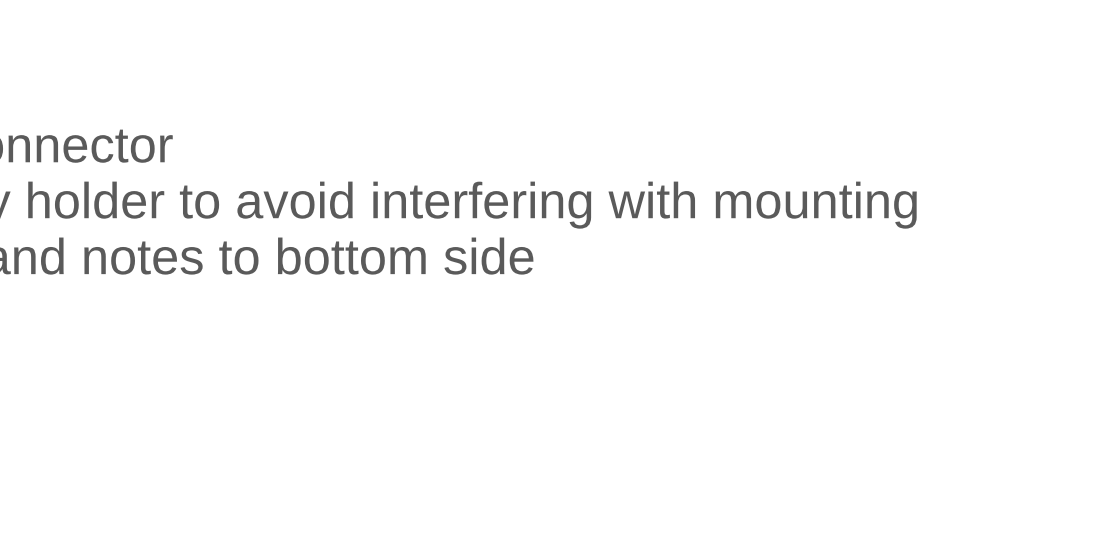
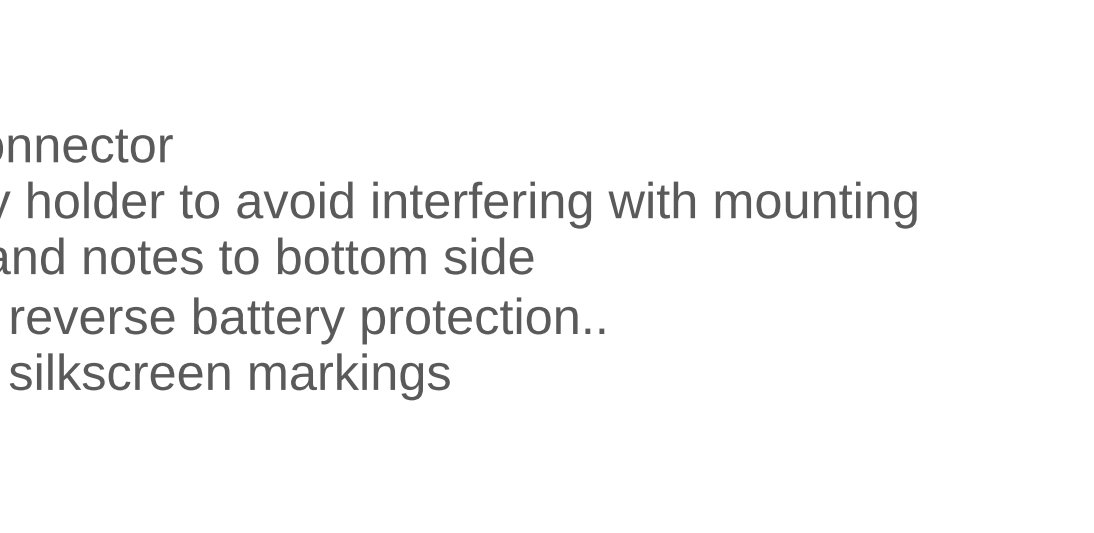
text: none -> reverse battery protection.. (307, 320)
text: none -> silkscreen markings (229, 376)

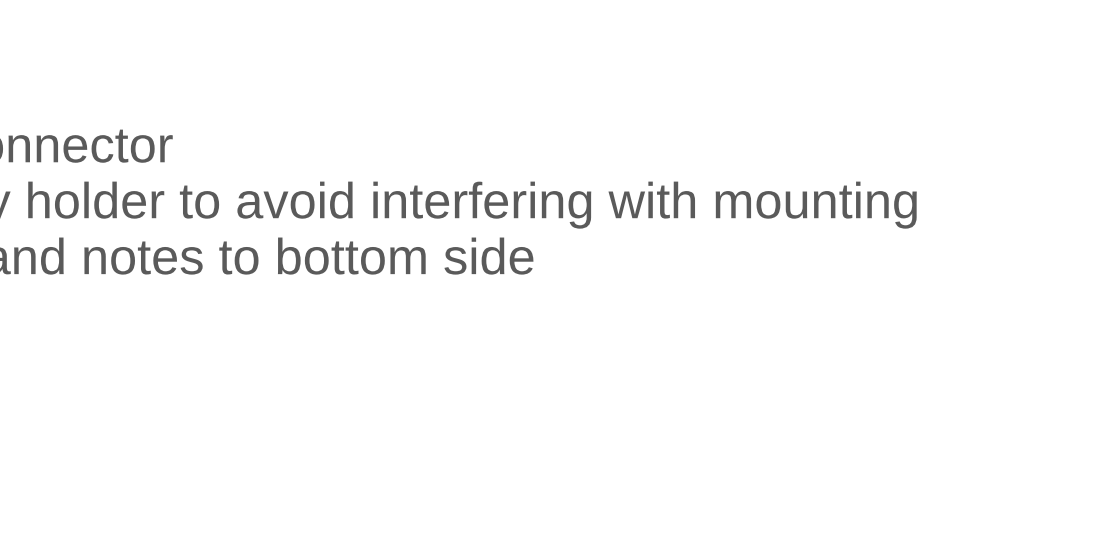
text: reverse battery protection.. (307, 320) -> none
text: silkscreen markings (229, 376) -> none

